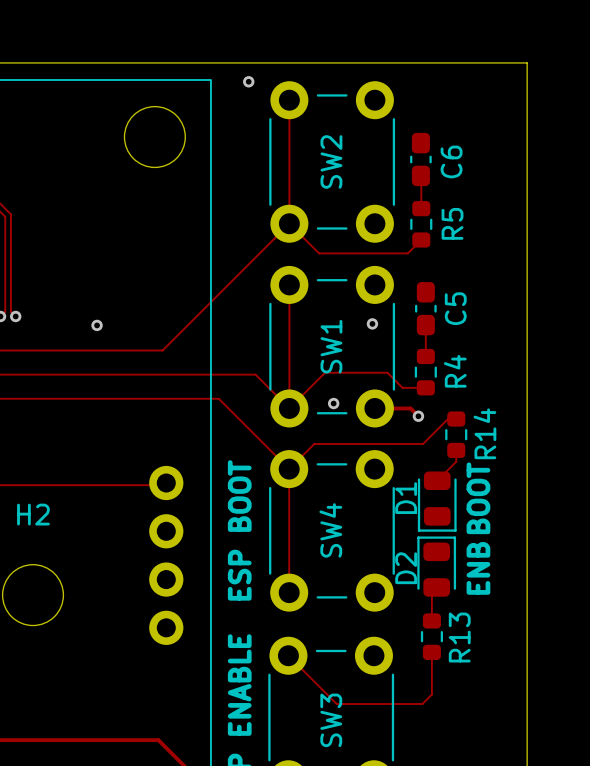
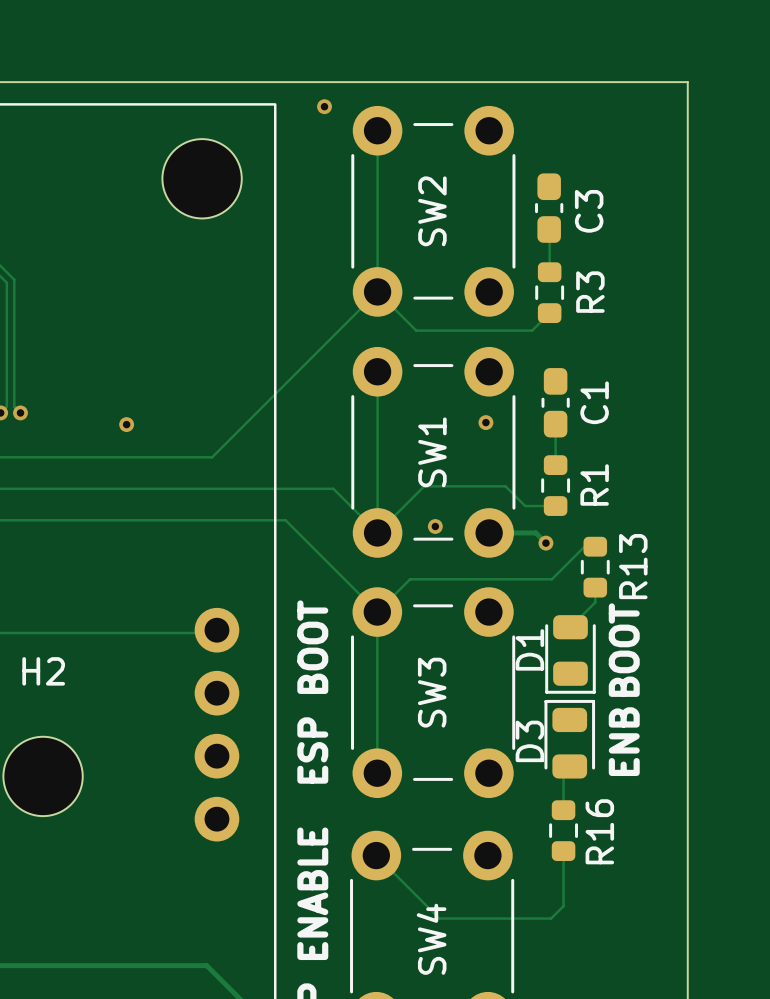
C6 name: C6 (451, 161) -> C3 (589, 211)
R5 name: R5 (452, 223) -> R3 (590, 292)
C5 name: C5 (455, 308) -> C1 (594, 402)
R4 name: R4 (455, 371) -> R1 (594, 484)
R14 name: R14 (484, 433) -> R13 (633, 566)
SW4 name: SW4 (330, 530) -> SW3 (432, 692)
D2 name: D2 (406, 568) -> D3 (529, 741)
R13 name: R13 (459, 637) -> R16 (599, 831)
SW3 name: SW3 (331, 720) -> SW4 (431, 939)

